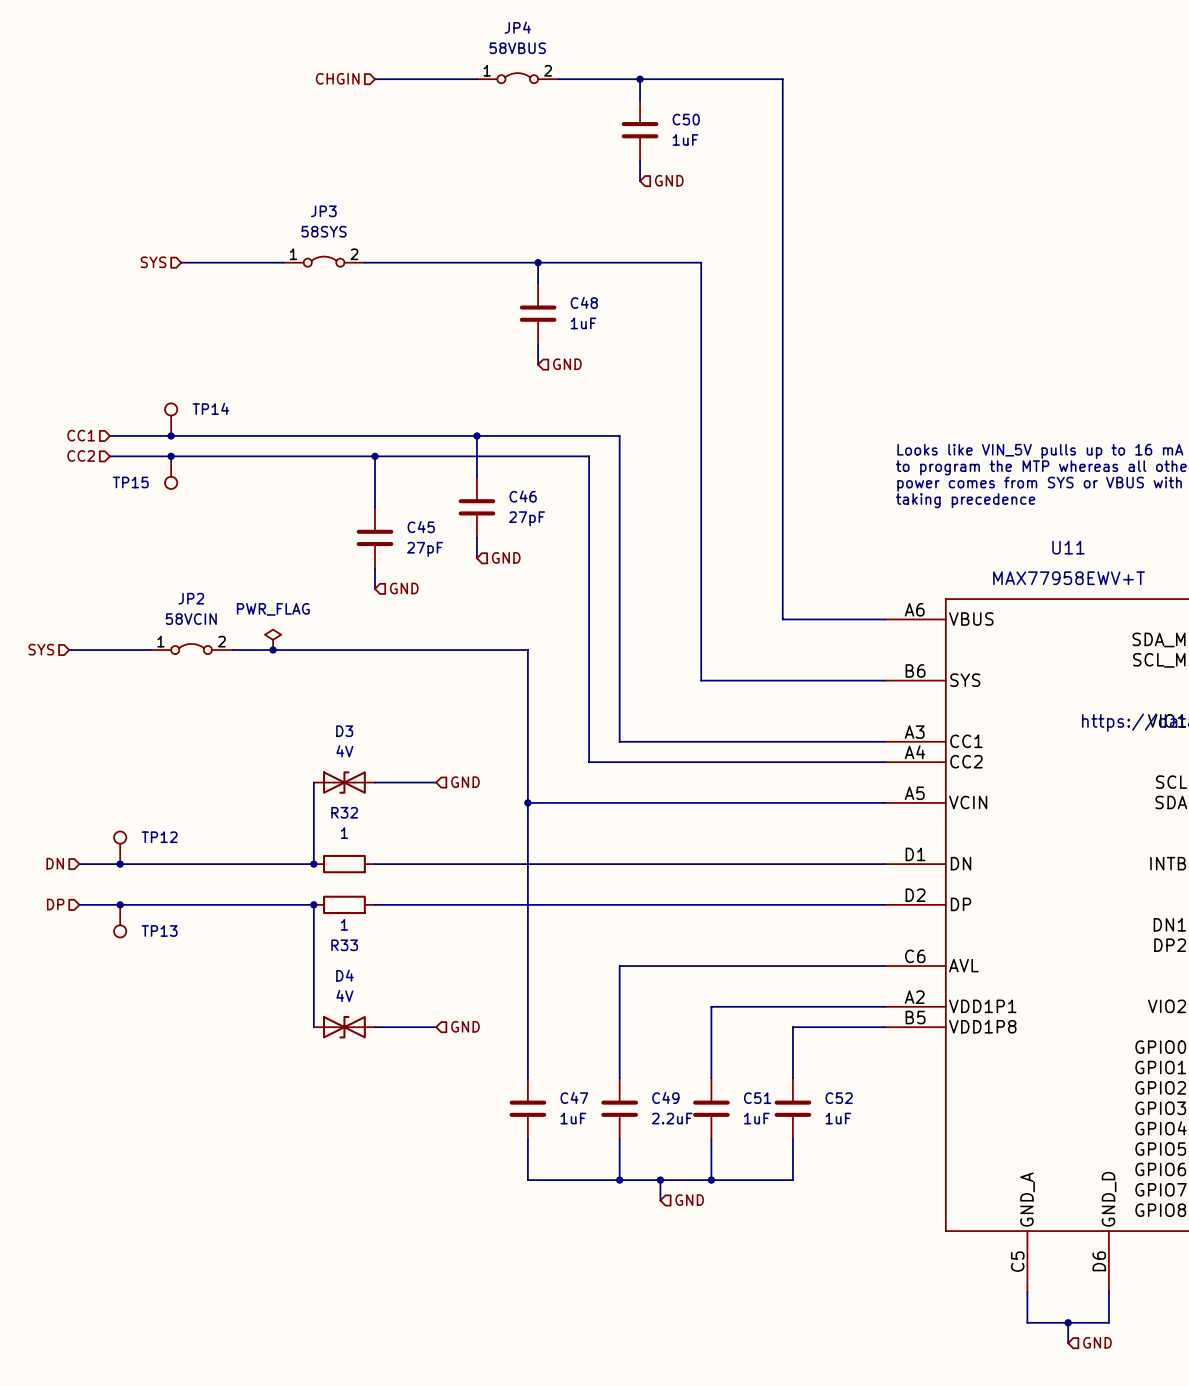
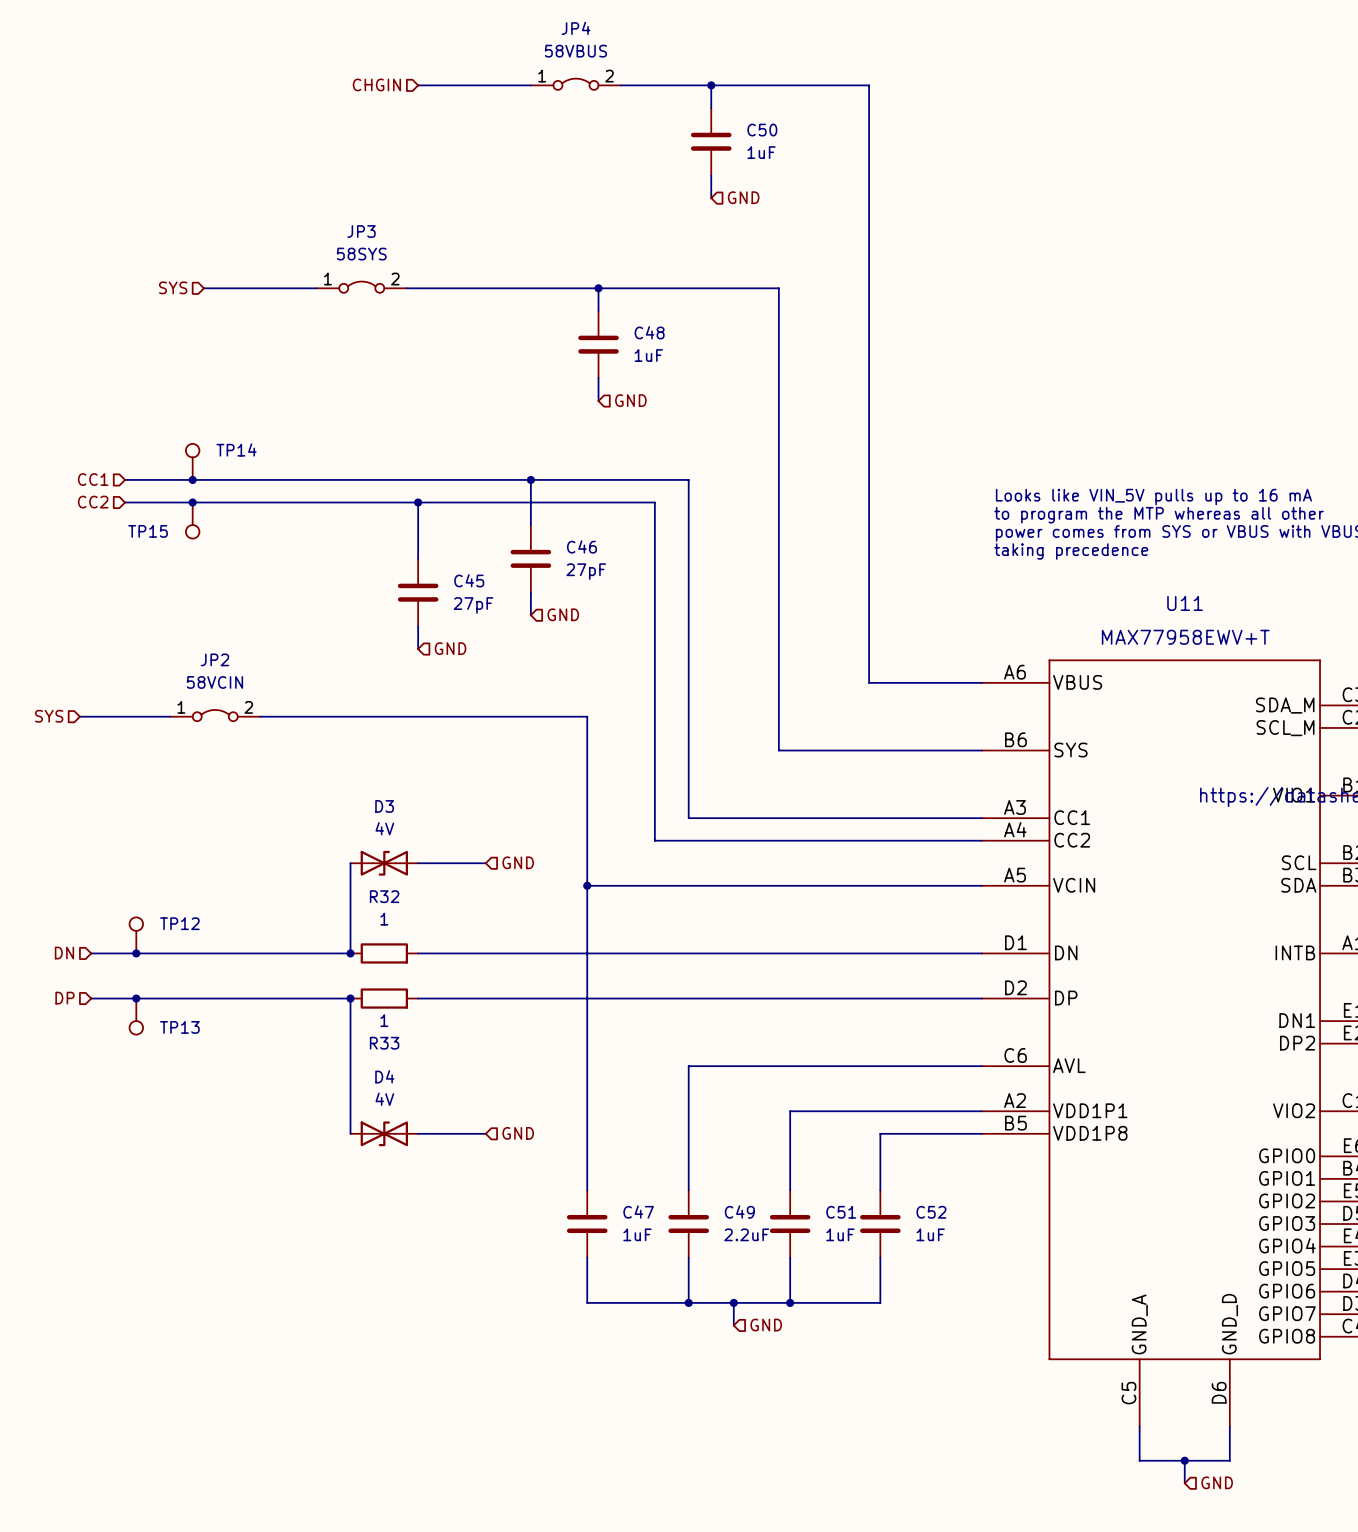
power symbol: PWR_FLAG (273, 639) -> none
junction: (273, 650) -> none

